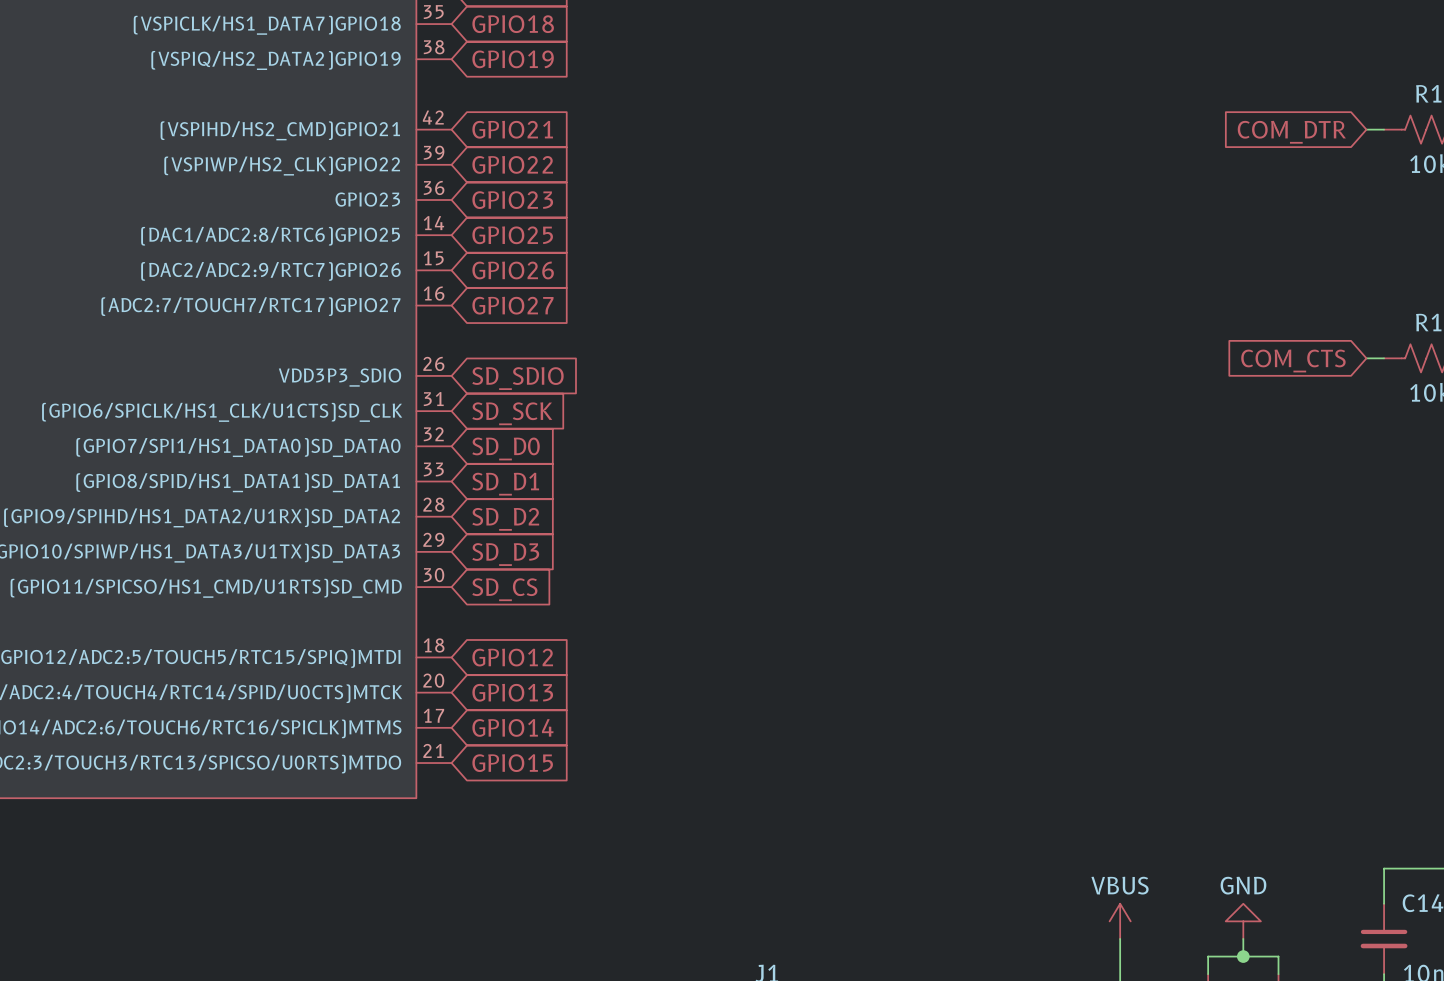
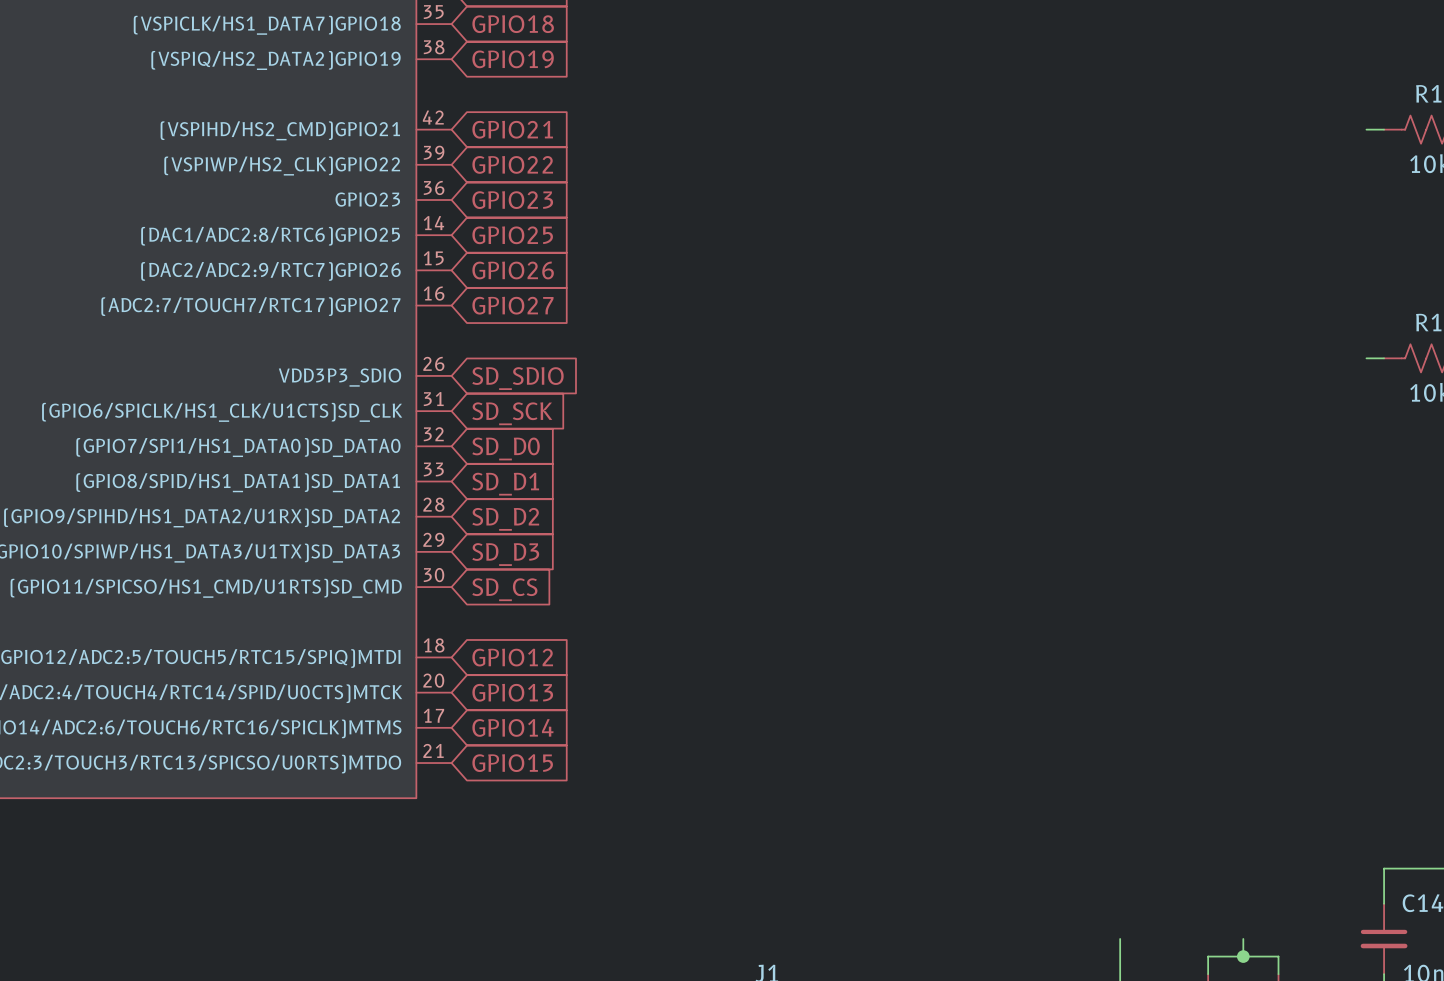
global label: COM_DTR (1291, 132) -> none
global label: COM_CTS (1293, 360) -> none
power symbol: VBUS (1120, 921) -> none
power symbol: GND (1243, 921) -> none

